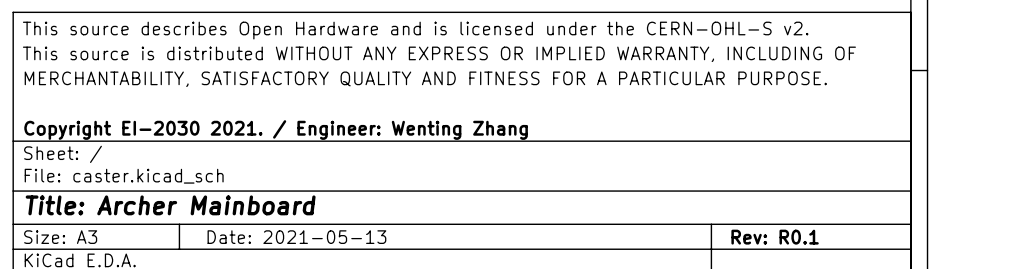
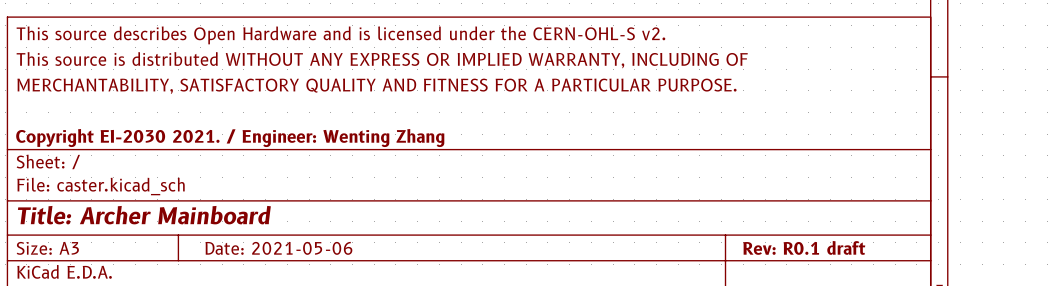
title block: Date: 2021-05-13 (296, 237) -> Date: 2021-05-06 (278, 248)
title block: Rev: R0.1 (775, 237) -> Rev: R0.1 draft (804, 247)

